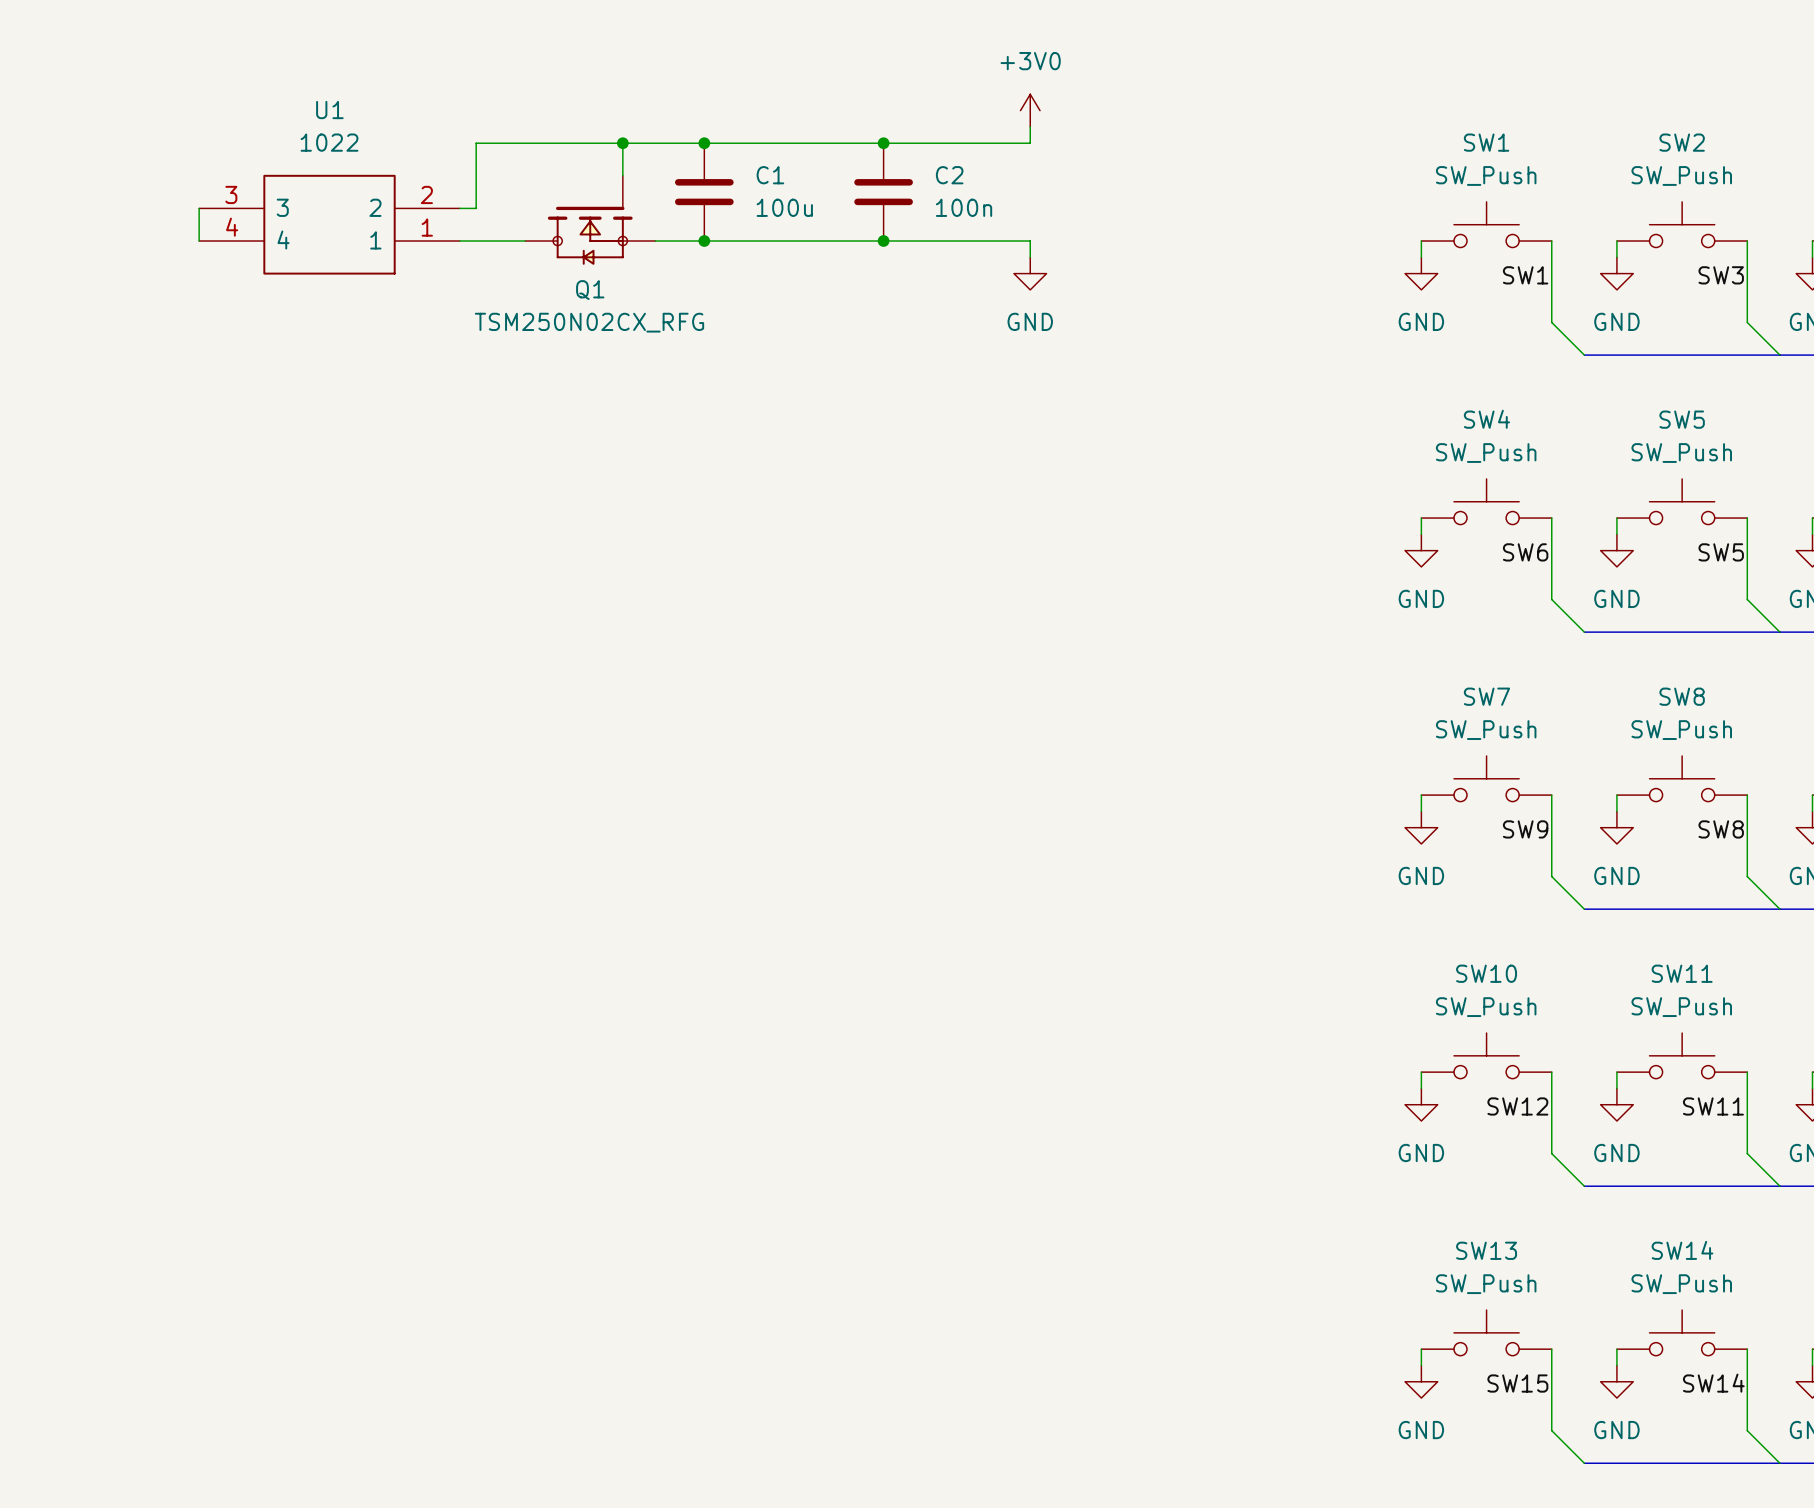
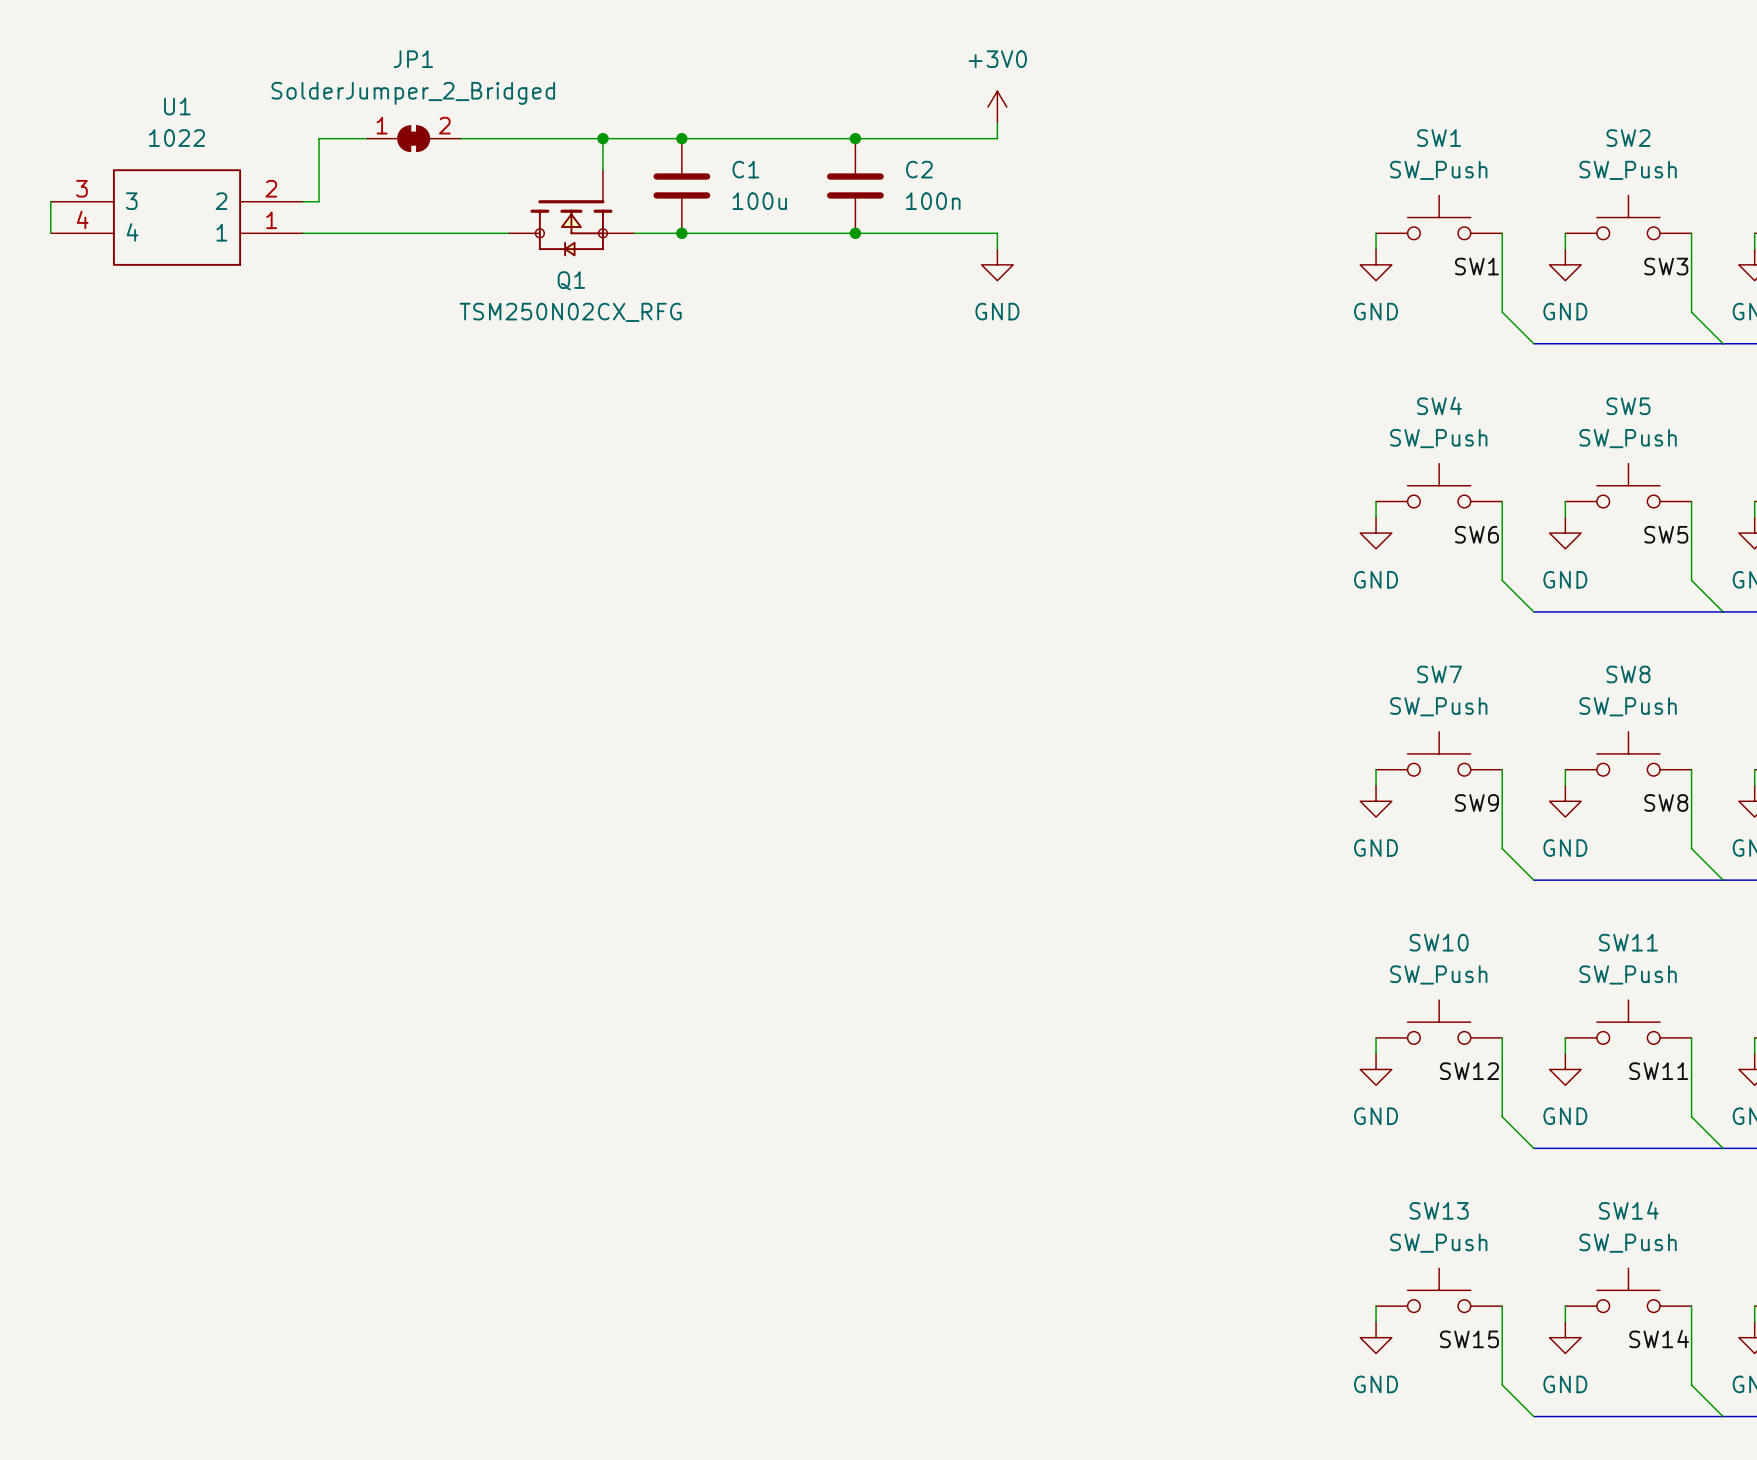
wire: none -> (366, 138) (318, 138) (318, 201) (303, 201)
JP1: none -> SolderJumper_2_Bridged (413, 138)
wire: (476, 143) (476, 208) (459, 208) -> none
wire: (199, 208) (199, 241) -> (50, 201) (50, 233)
U1 position: (329, 224) -> (177, 217)
wire: none -> (303, 233) (445, 233)

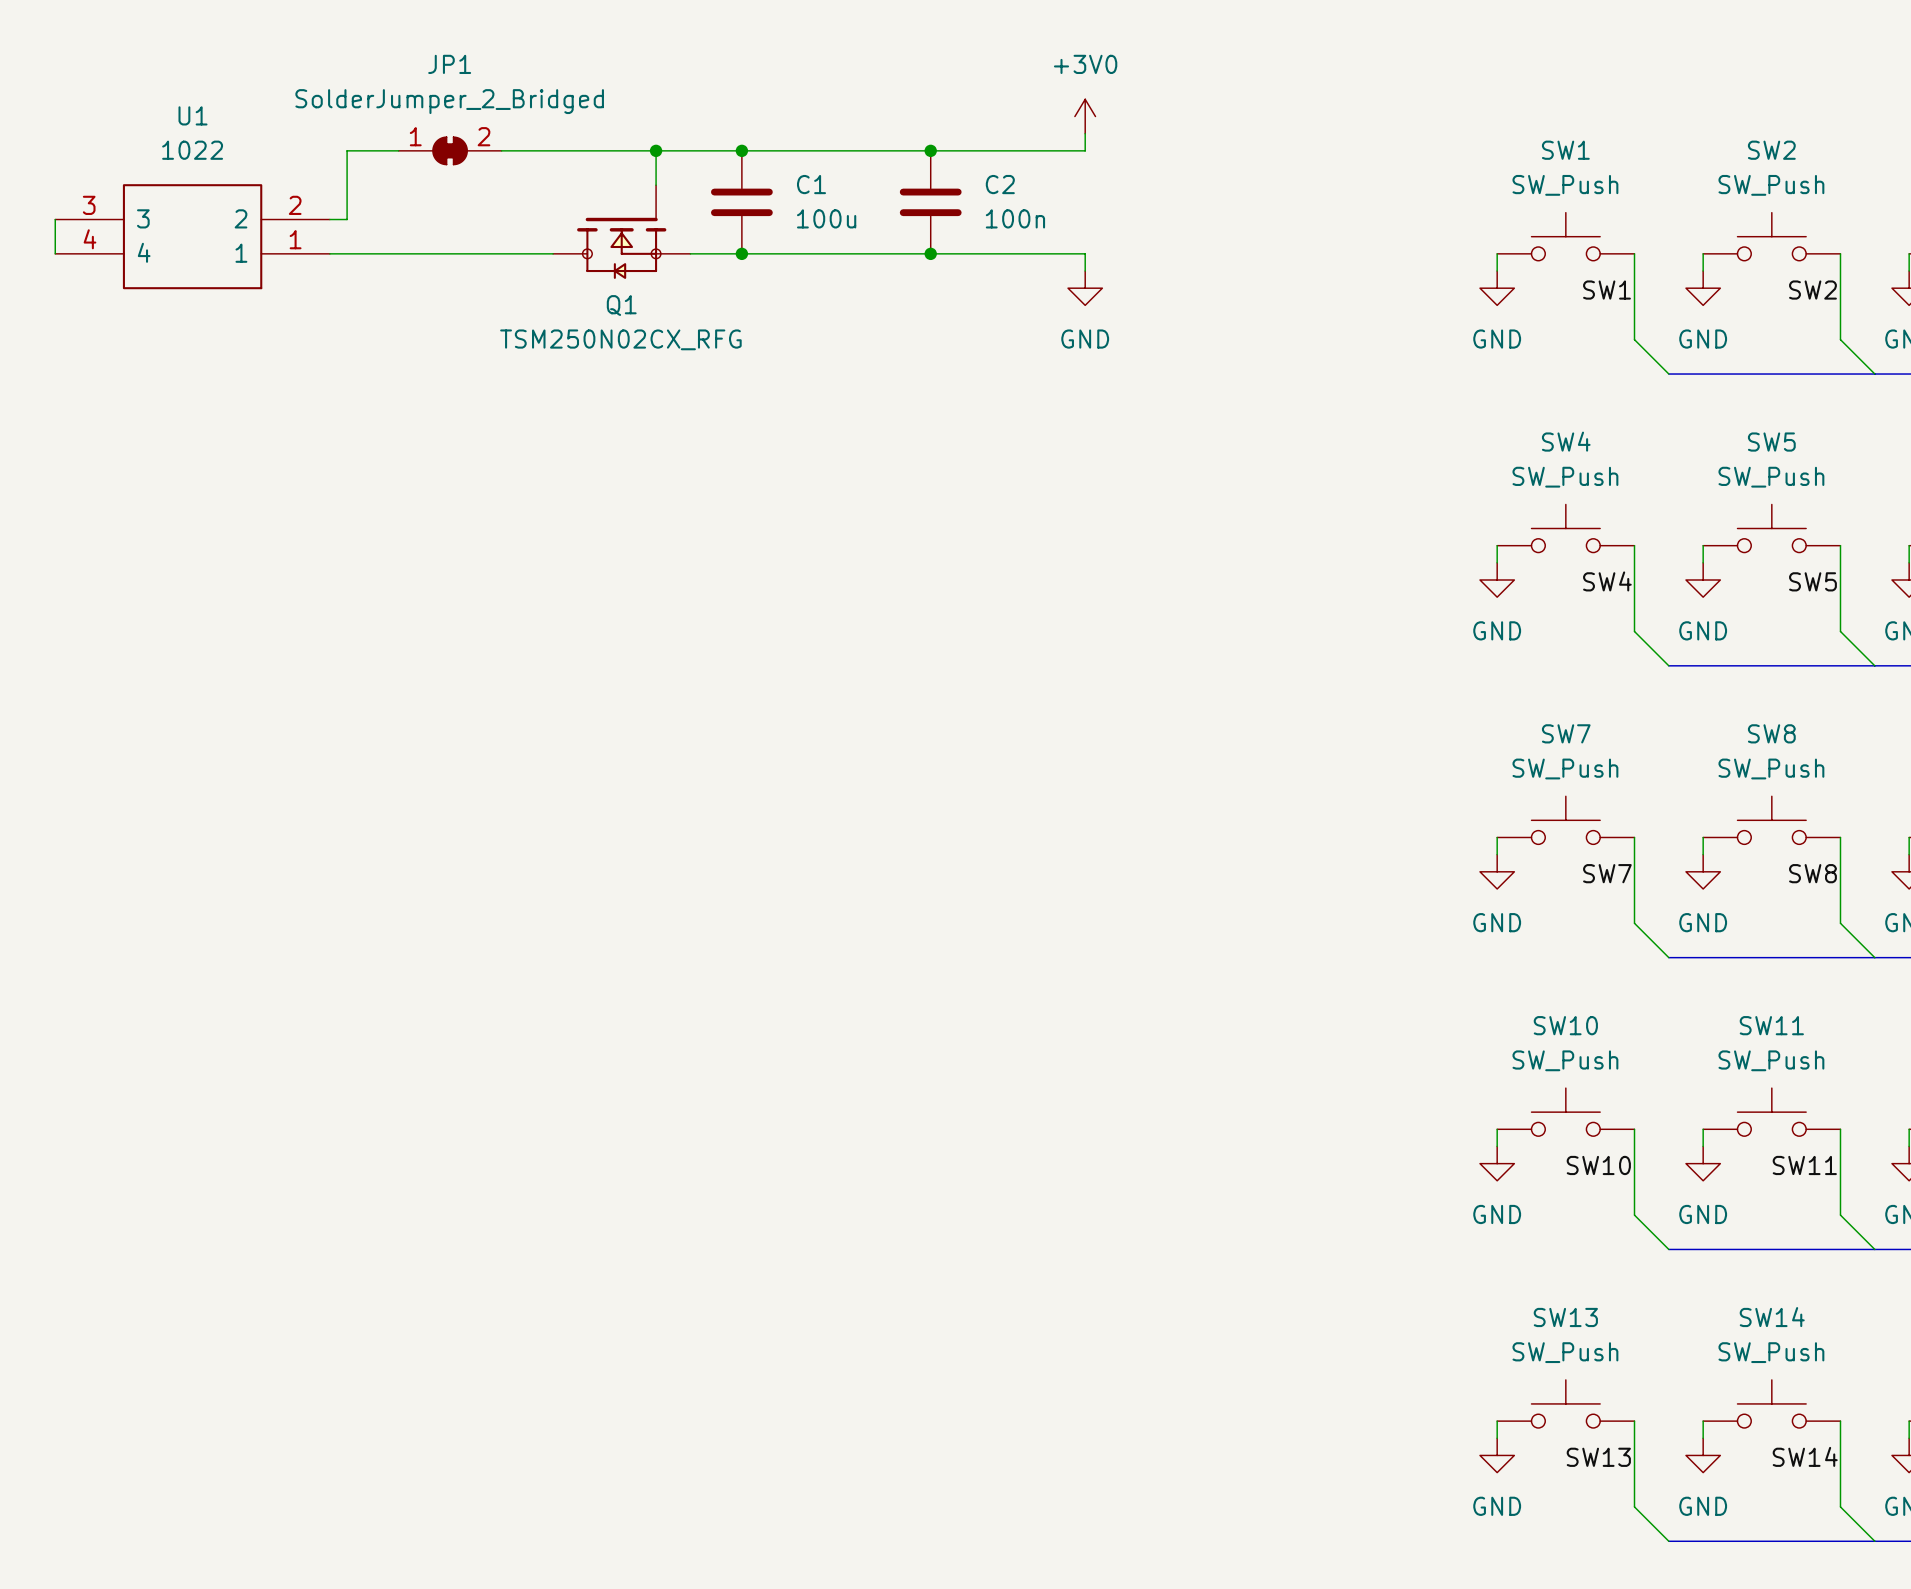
label: SW3 (1666, 266) -> SW2 (1812, 290)
label: SW6 (1476, 534) -> SW4 (1607, 581)
label: SW9 (1476, 802) -> SW7 (1607, 873)
label: SW12 (1469, 1071) -> SW10 (1598, 1165)
label: SW15 (1469, 1339) -> SW13 (1598, 1457)

